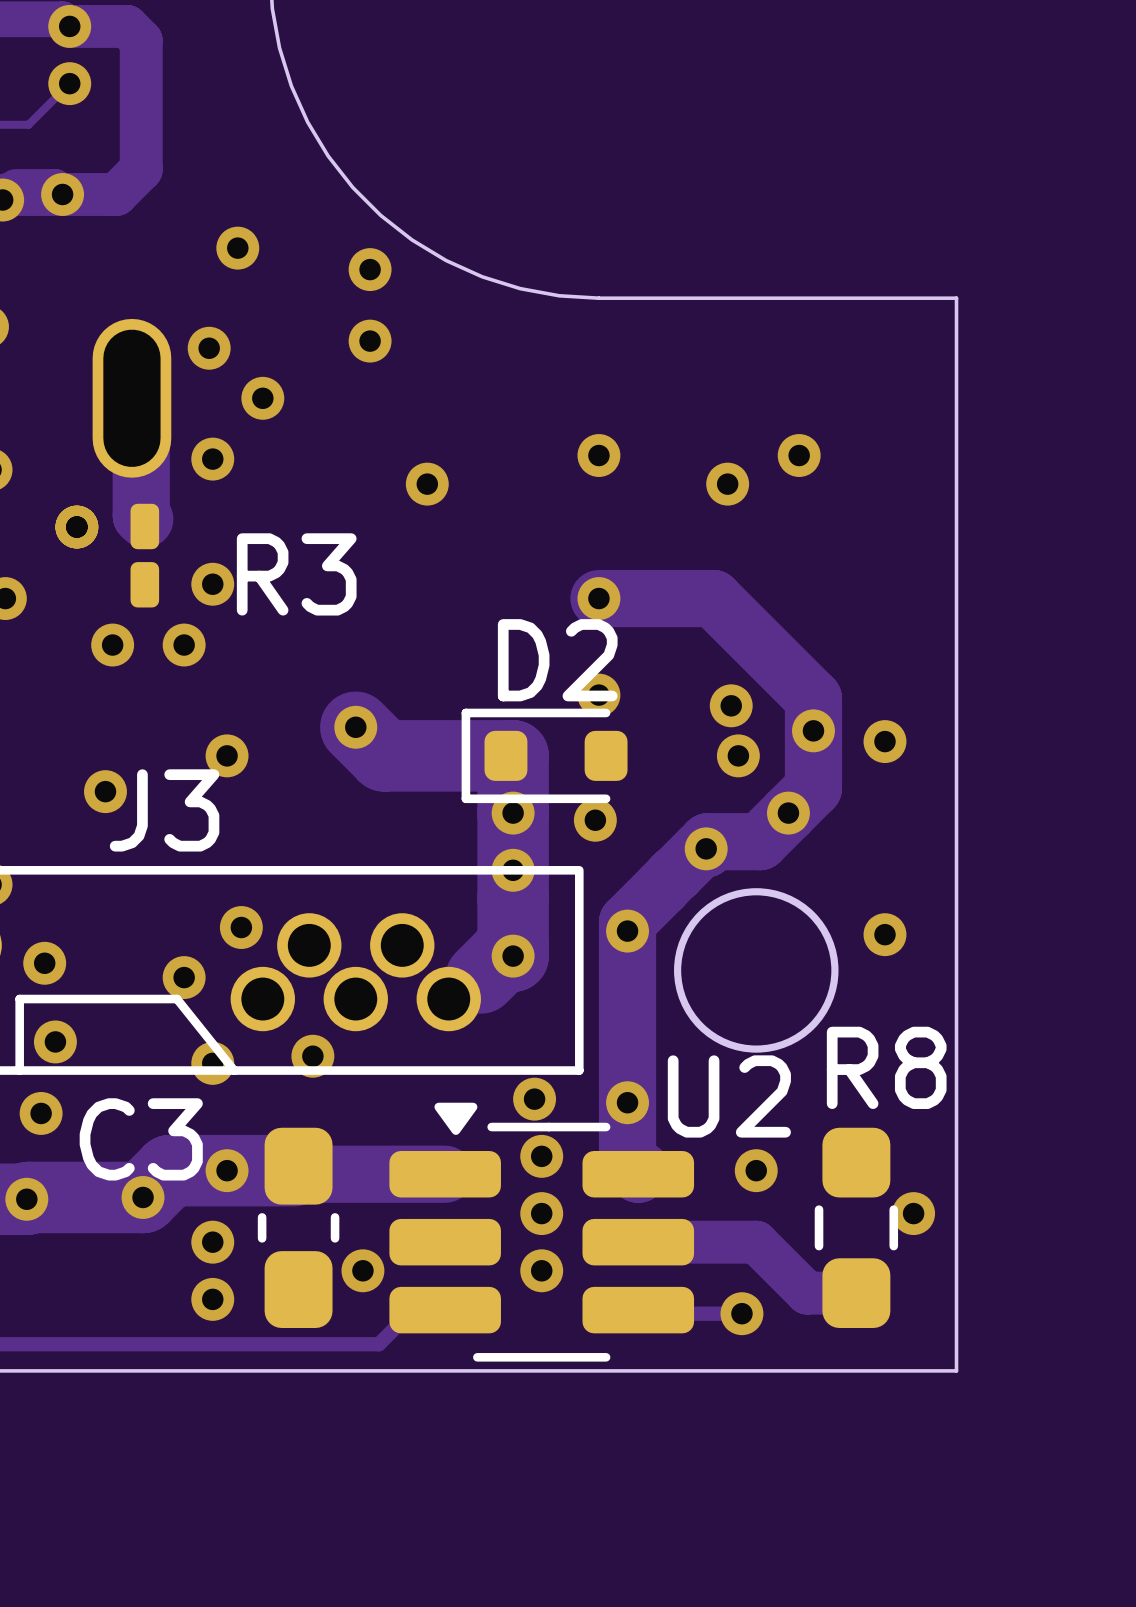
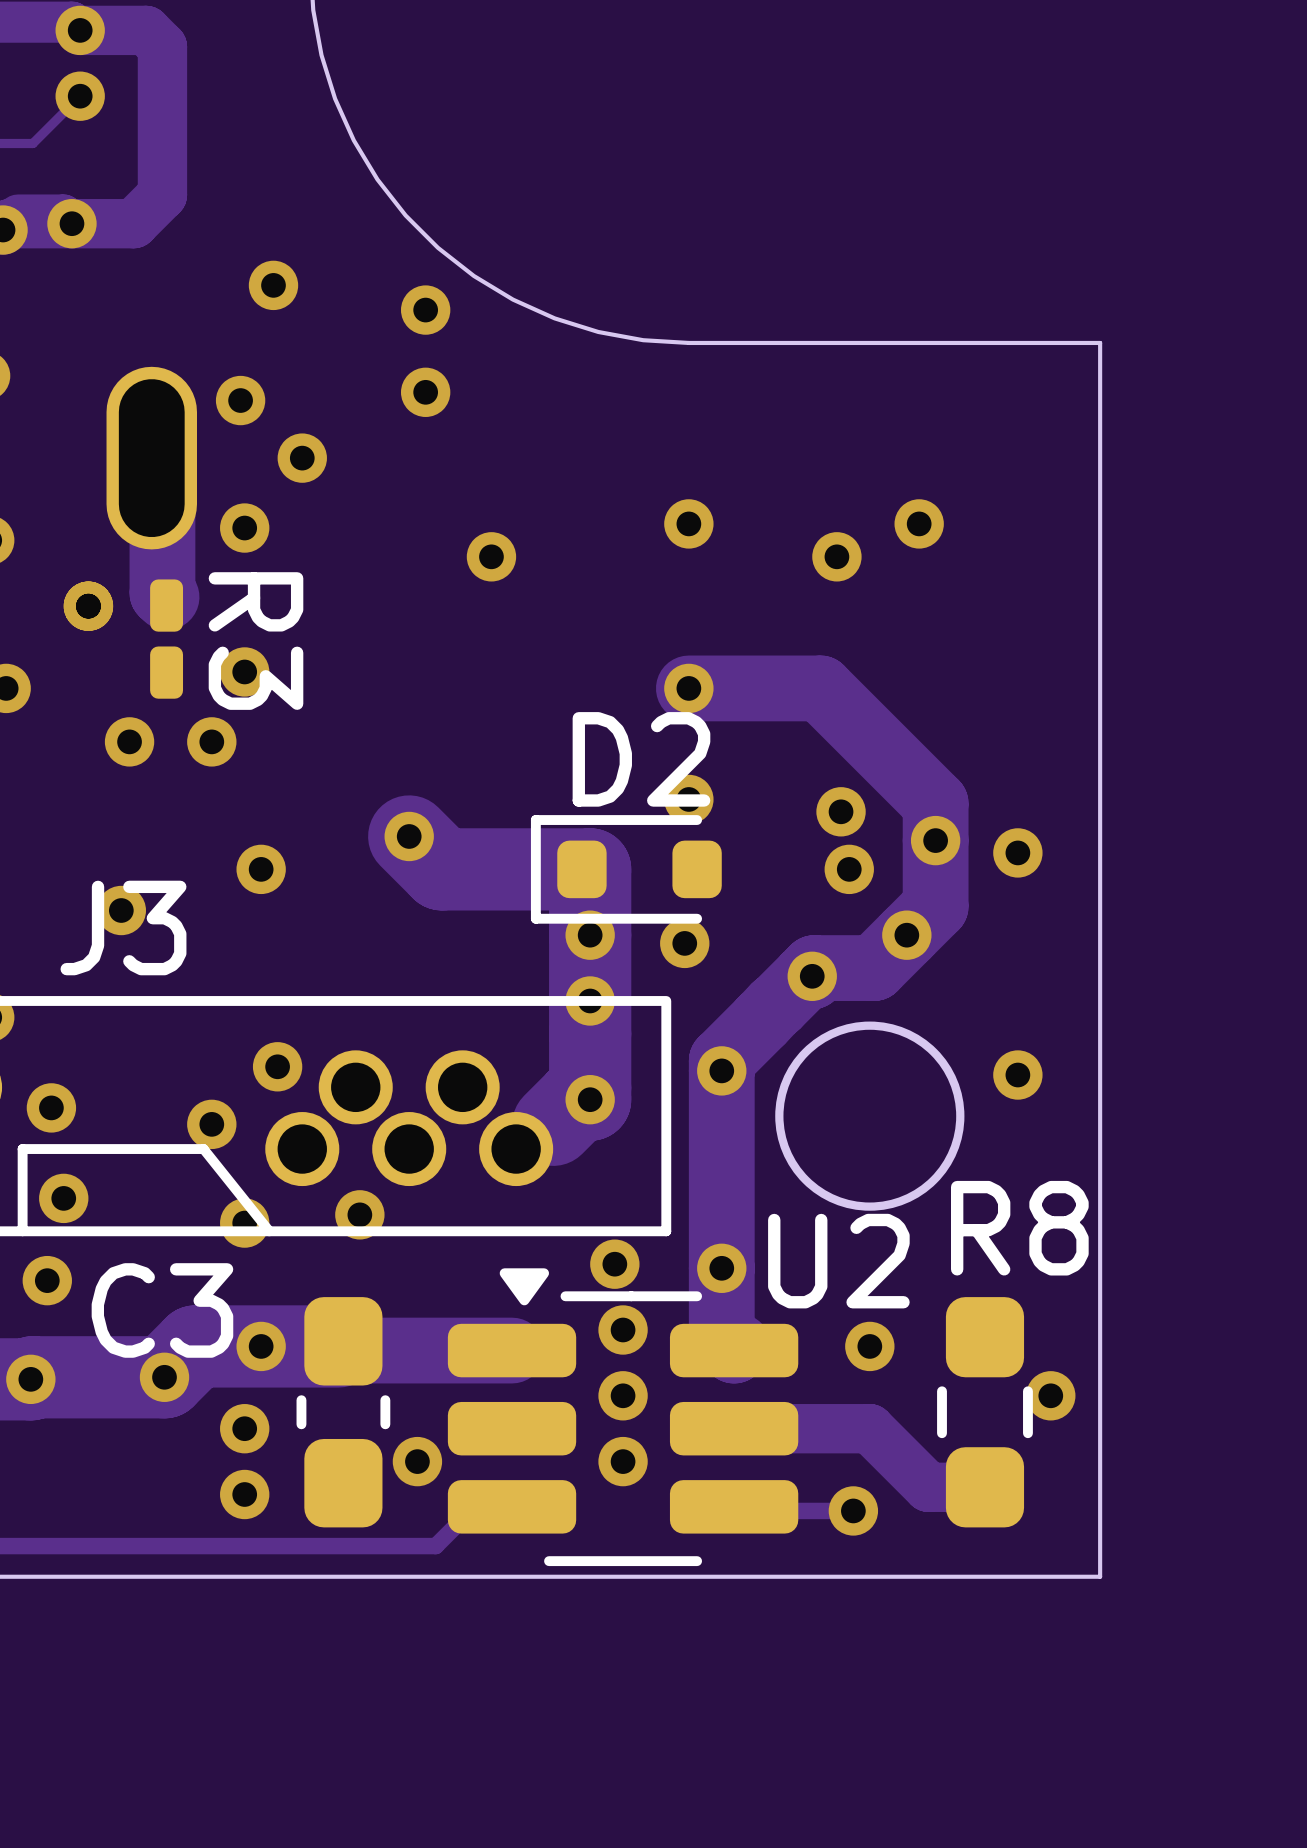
R3 name rotation: 0° (296, 574) -> 90° clockwise (256, 641)
J3 name position: J3 (164, 810) -> J3 (123, 927)

